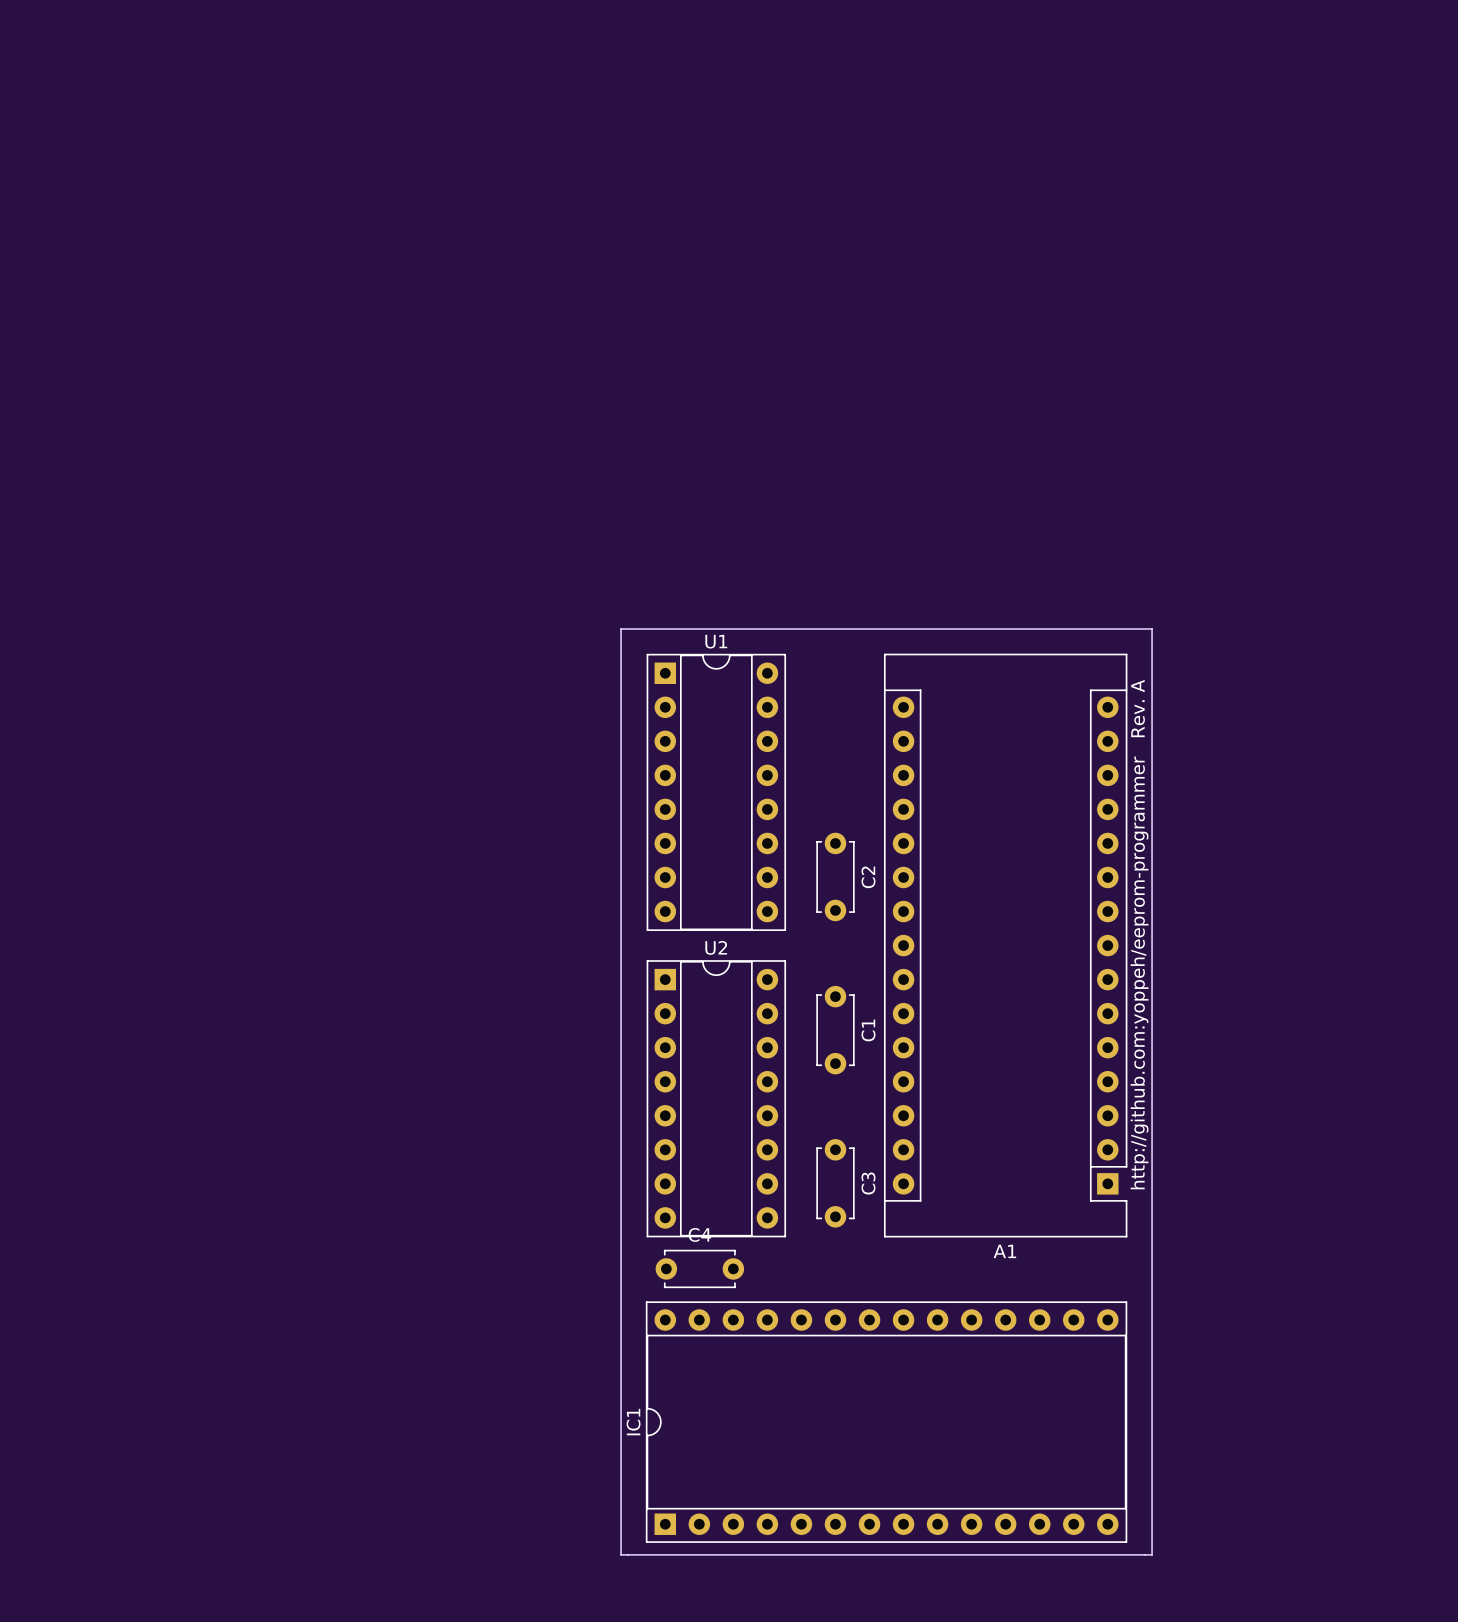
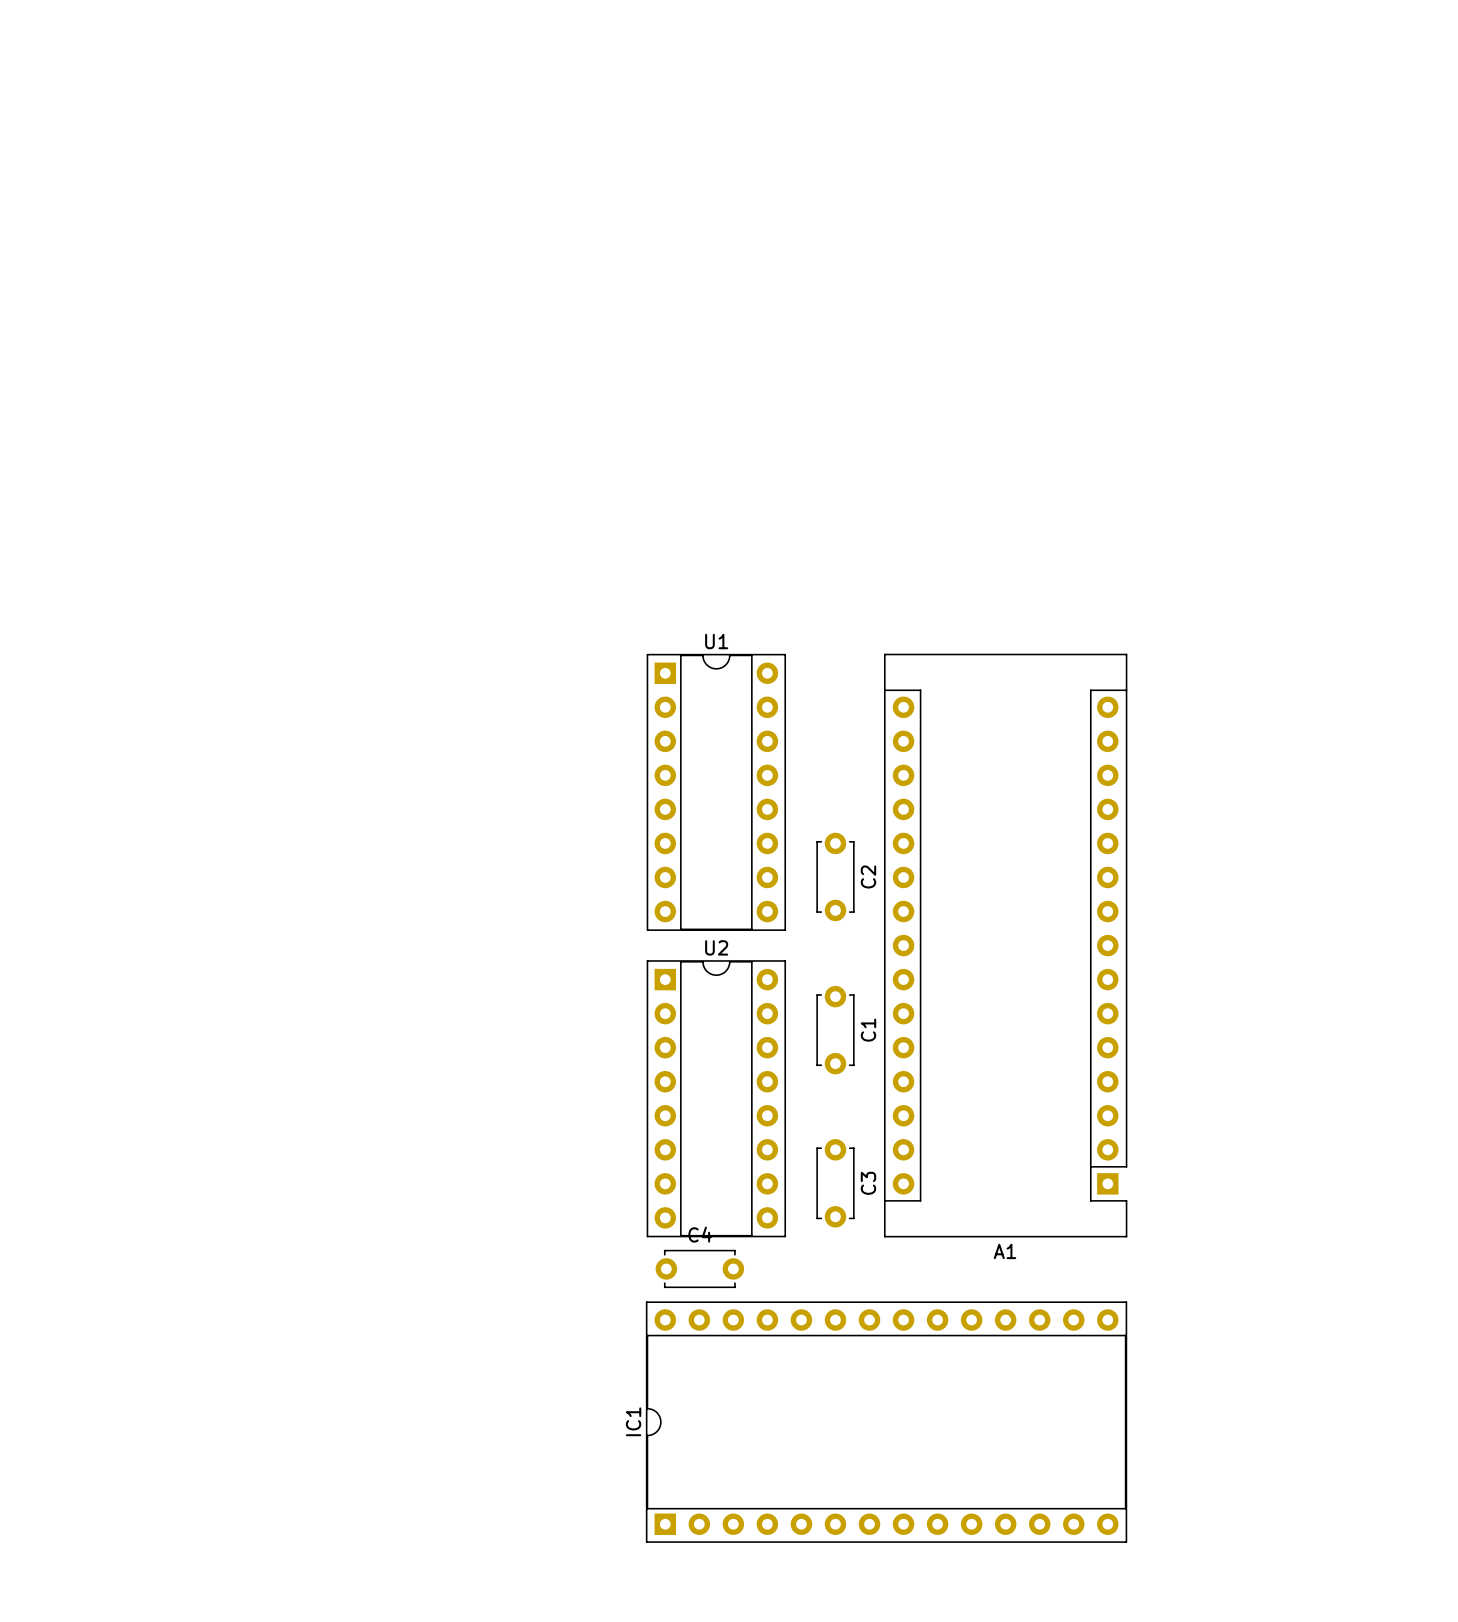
board edge: (621, 629) (1152, 629) (1152, 1554) (621, 1554) (621, 629) -> none
text: http://github.com:yoppeh/eeprom-programmer Rev. A (1139, 934) -> none

